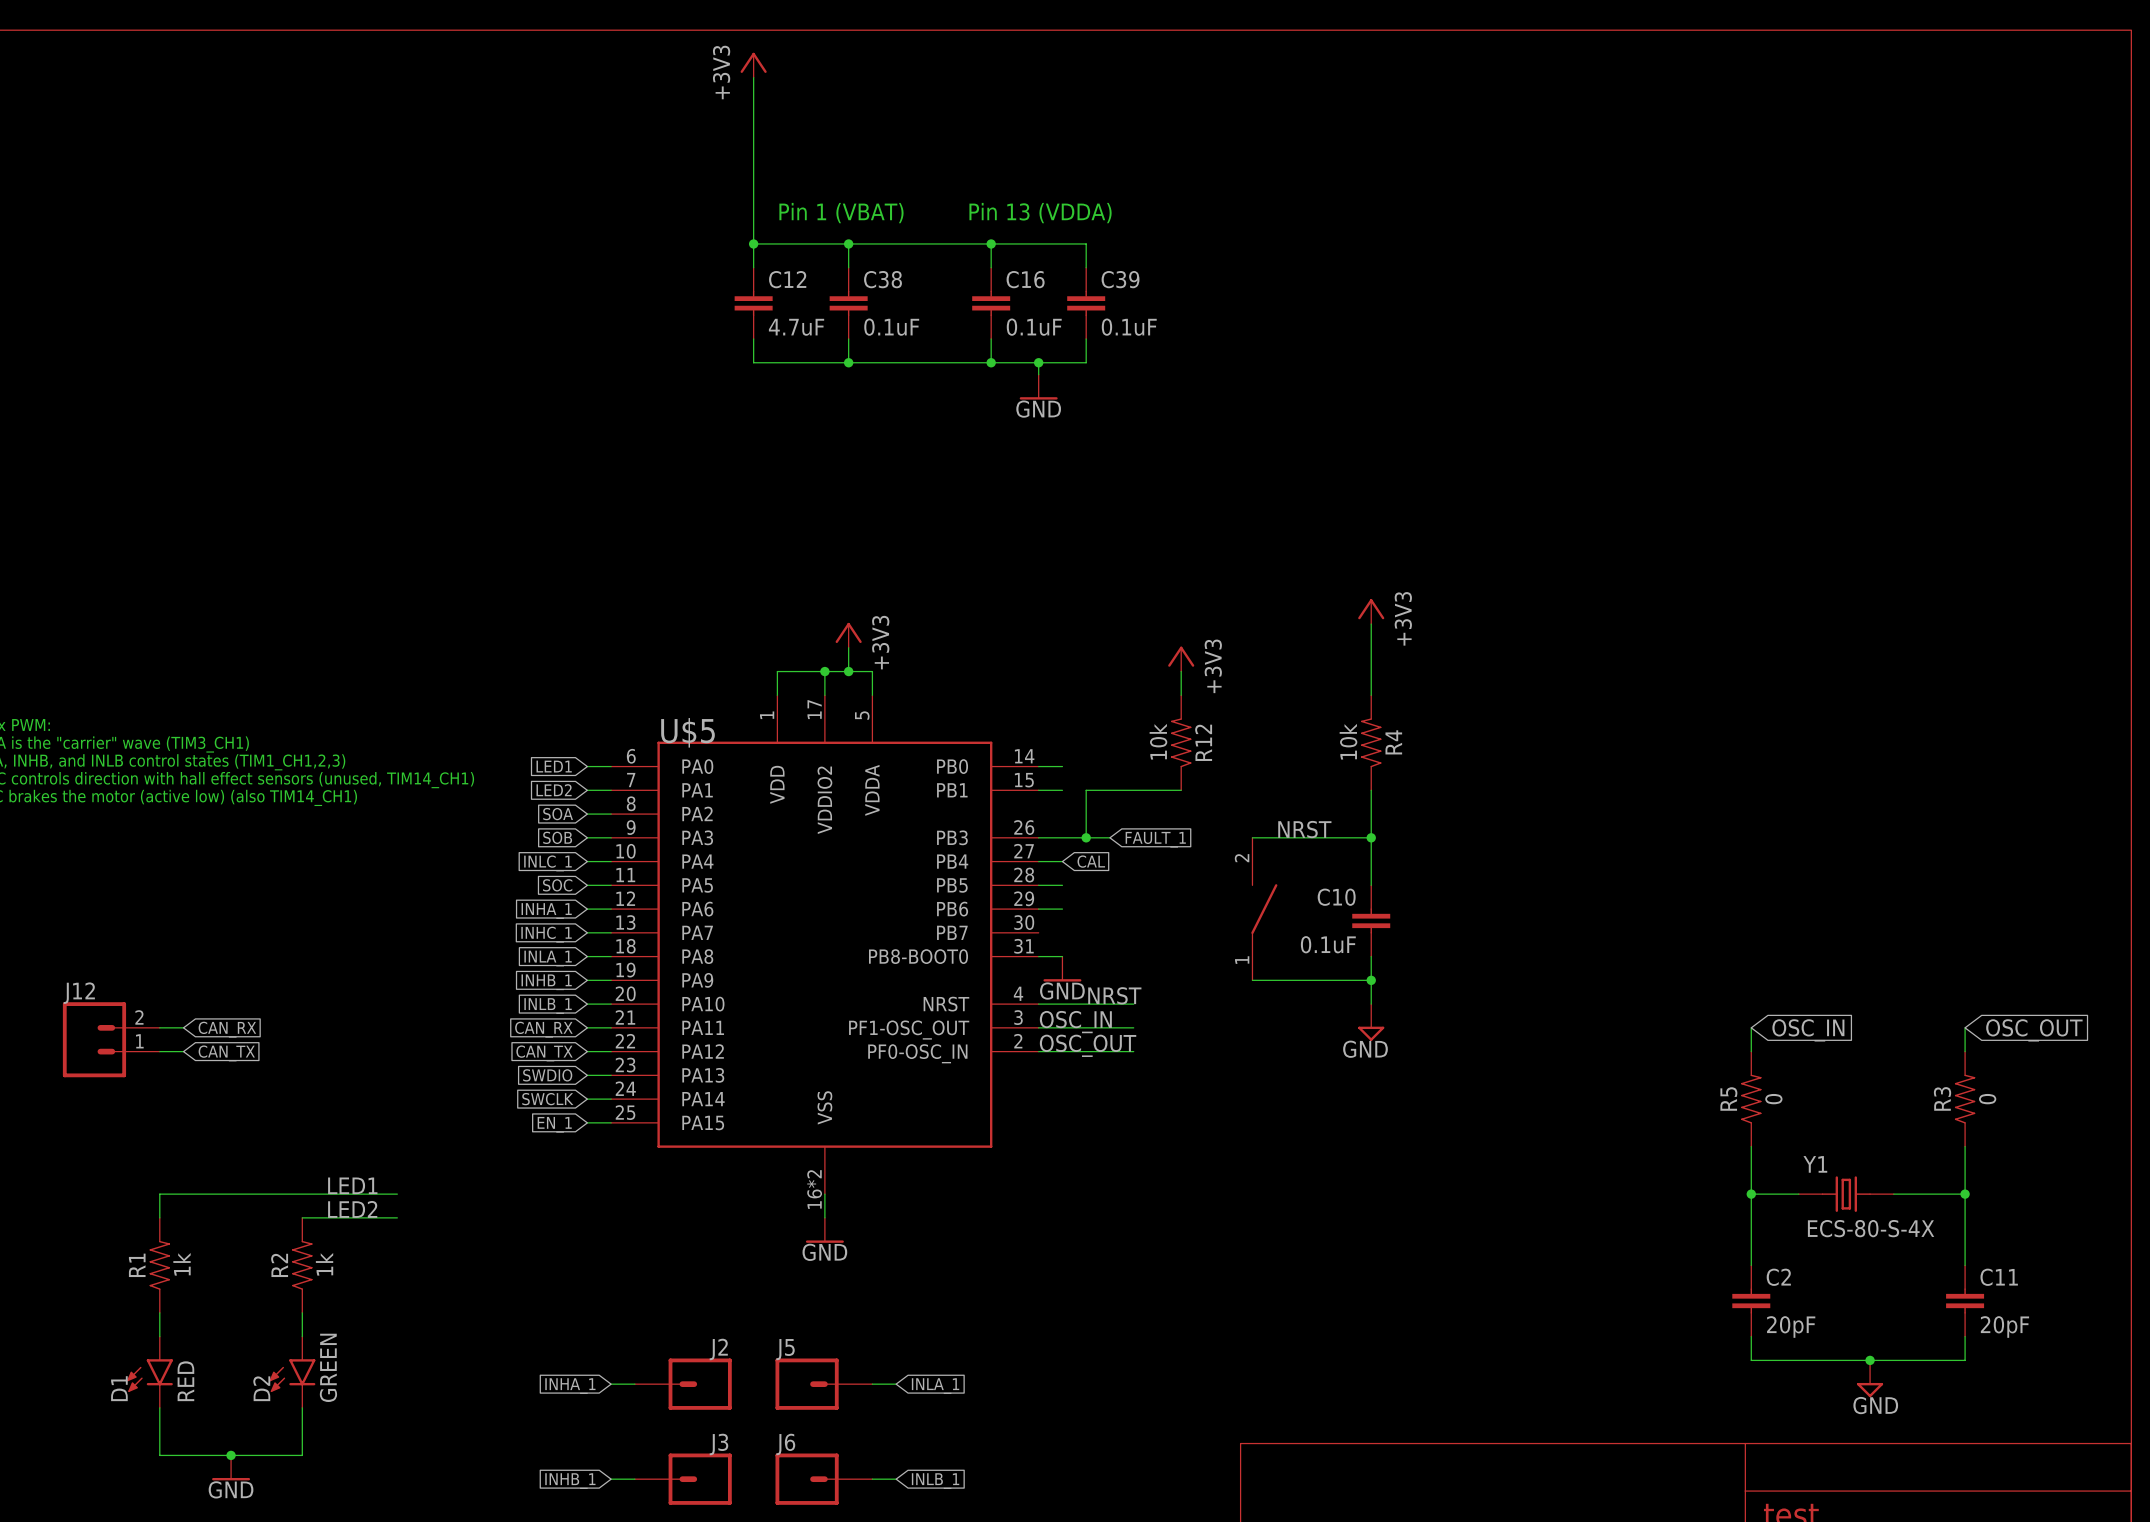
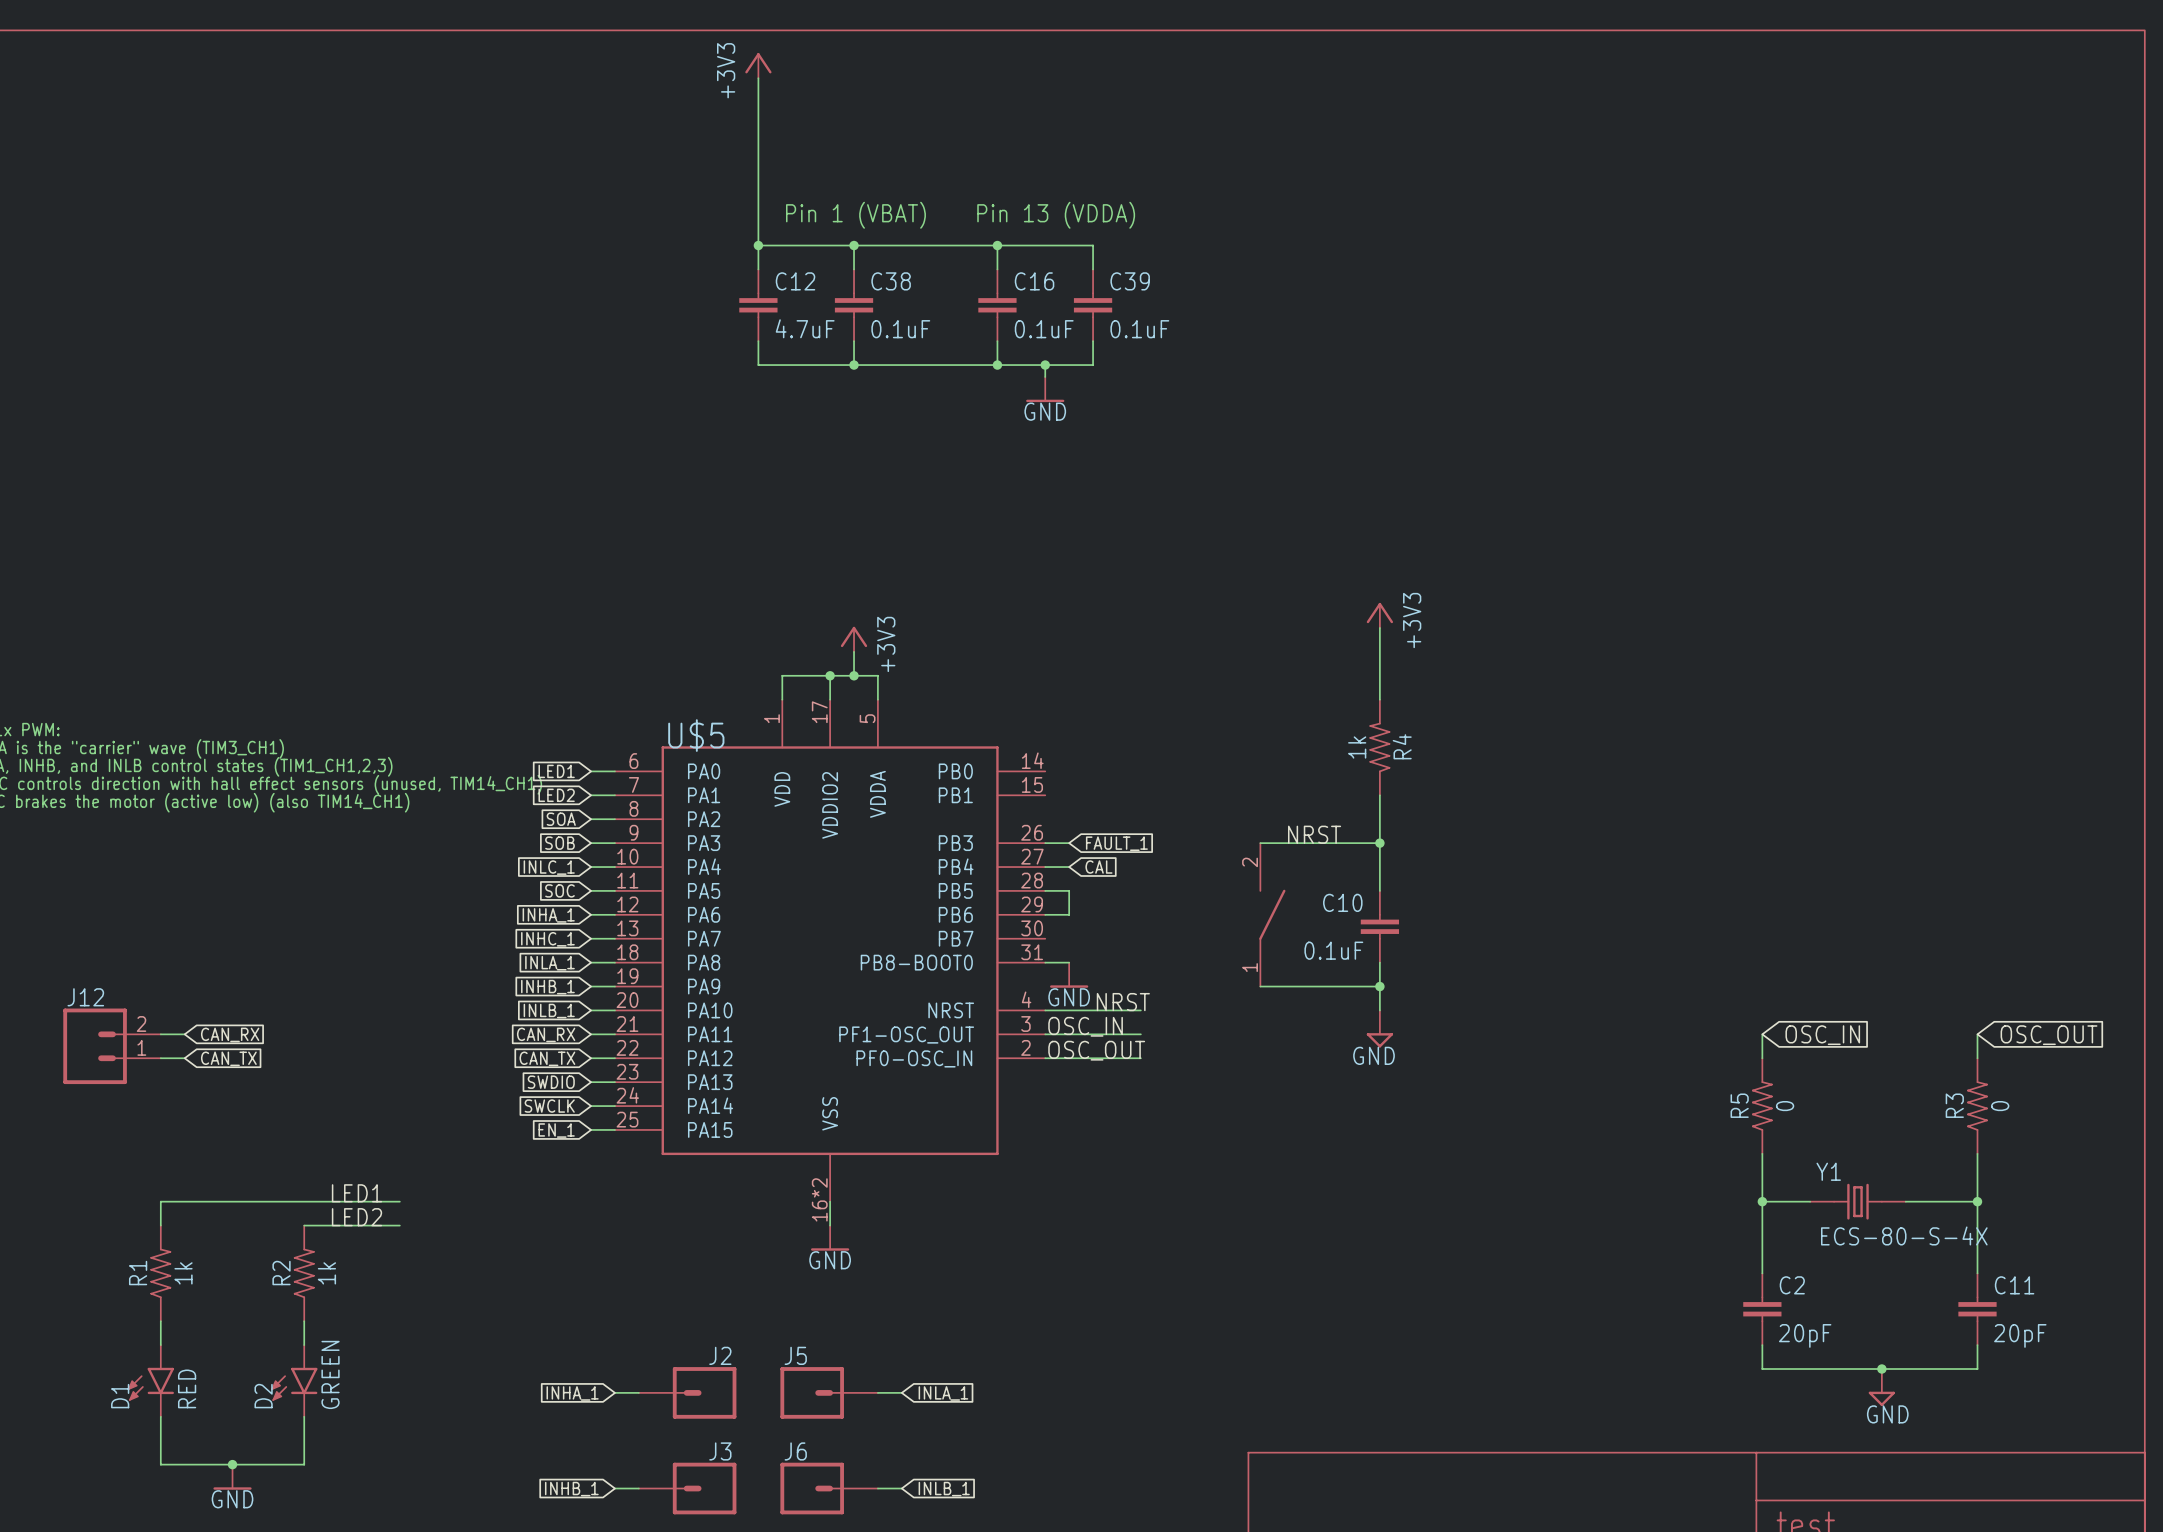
power symbol: +3V3 (1181, 659) -> none
wire: (1181, 671) (1181, 695) -> none
R4 value: 10k (1348, 741) -> 1k (1357, 747)
R12: 10k (1181, 742) -> none
wire: (1038, 766) (1062, 766) -> none
wire: (1038, 790) (1062, 790) -> none
wire: (1181, 790) (1086, 790) (1086, 837) -> none
wire: (1062, 837) (1109, 837) -> none
junction: (1086, 837) -> none
global label position: FAULT_1 (1155, 839) -> FAULT_1 (1116, 843)
wire: none -> (1069, 890) (1069, 914)

